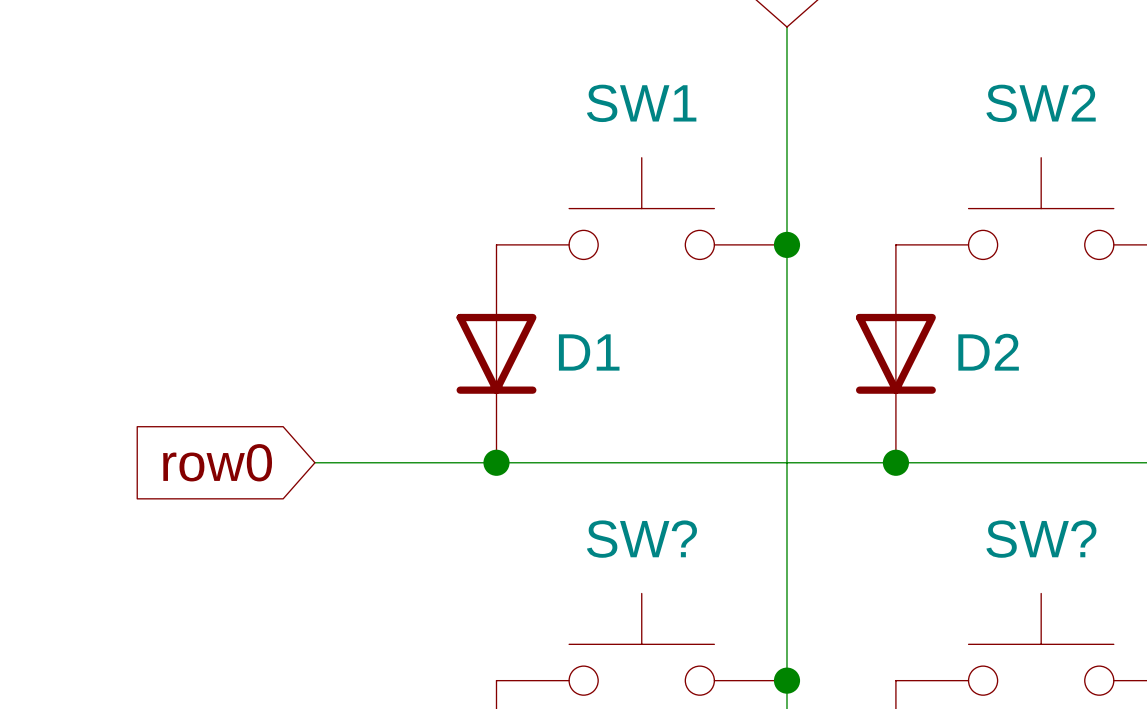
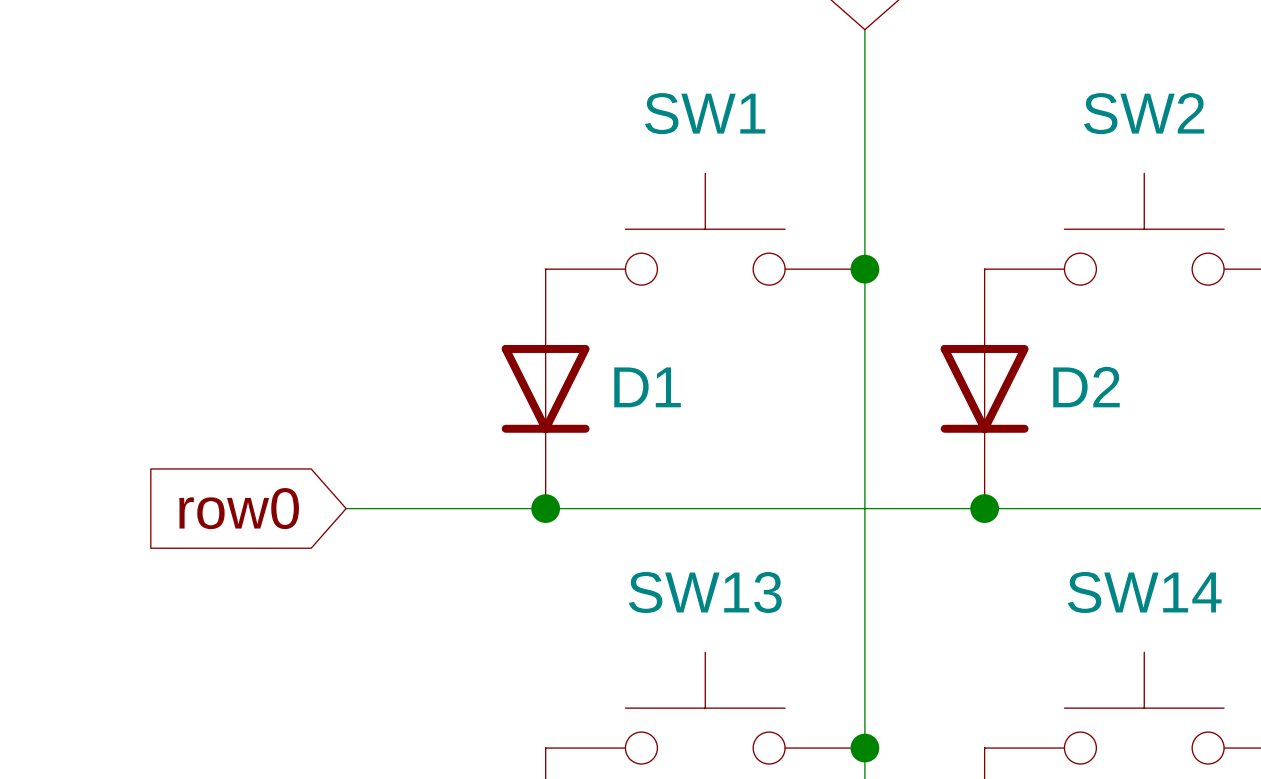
SW? name: SW? (641, 539) -> SW13 (705, 592)
SW? name: SW? (1041, 539) -> SW14 (1144, 592)

